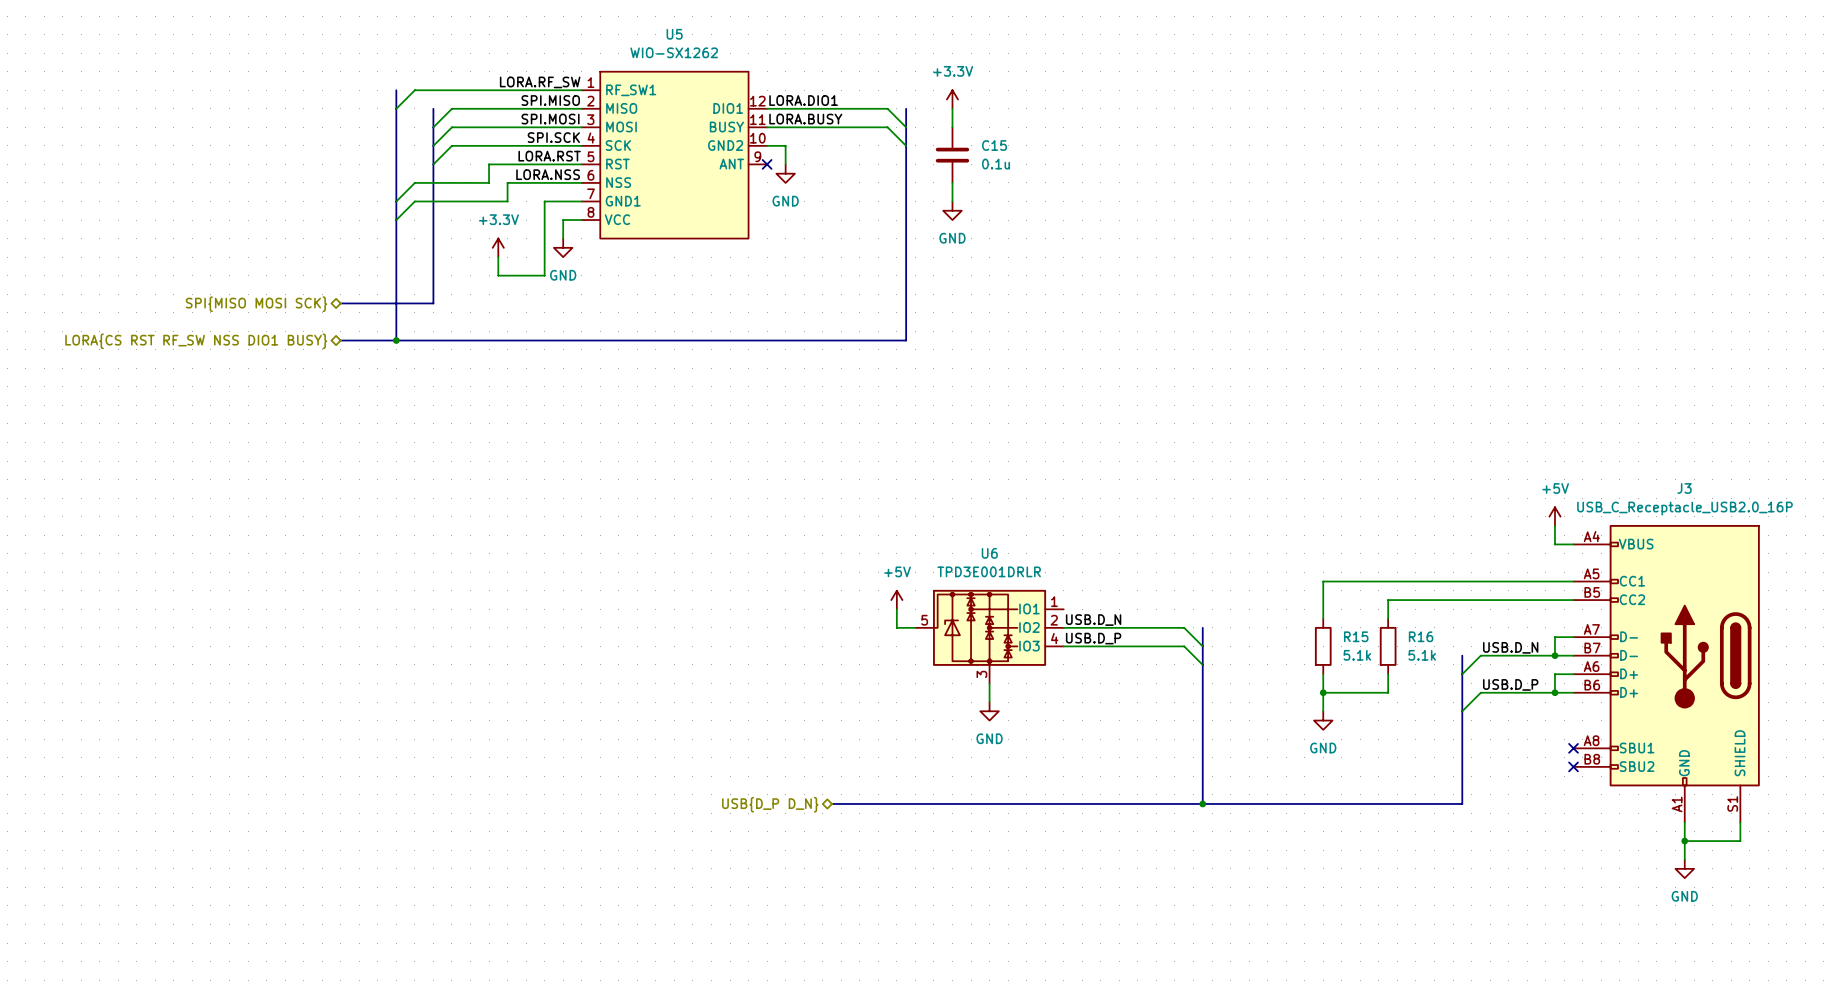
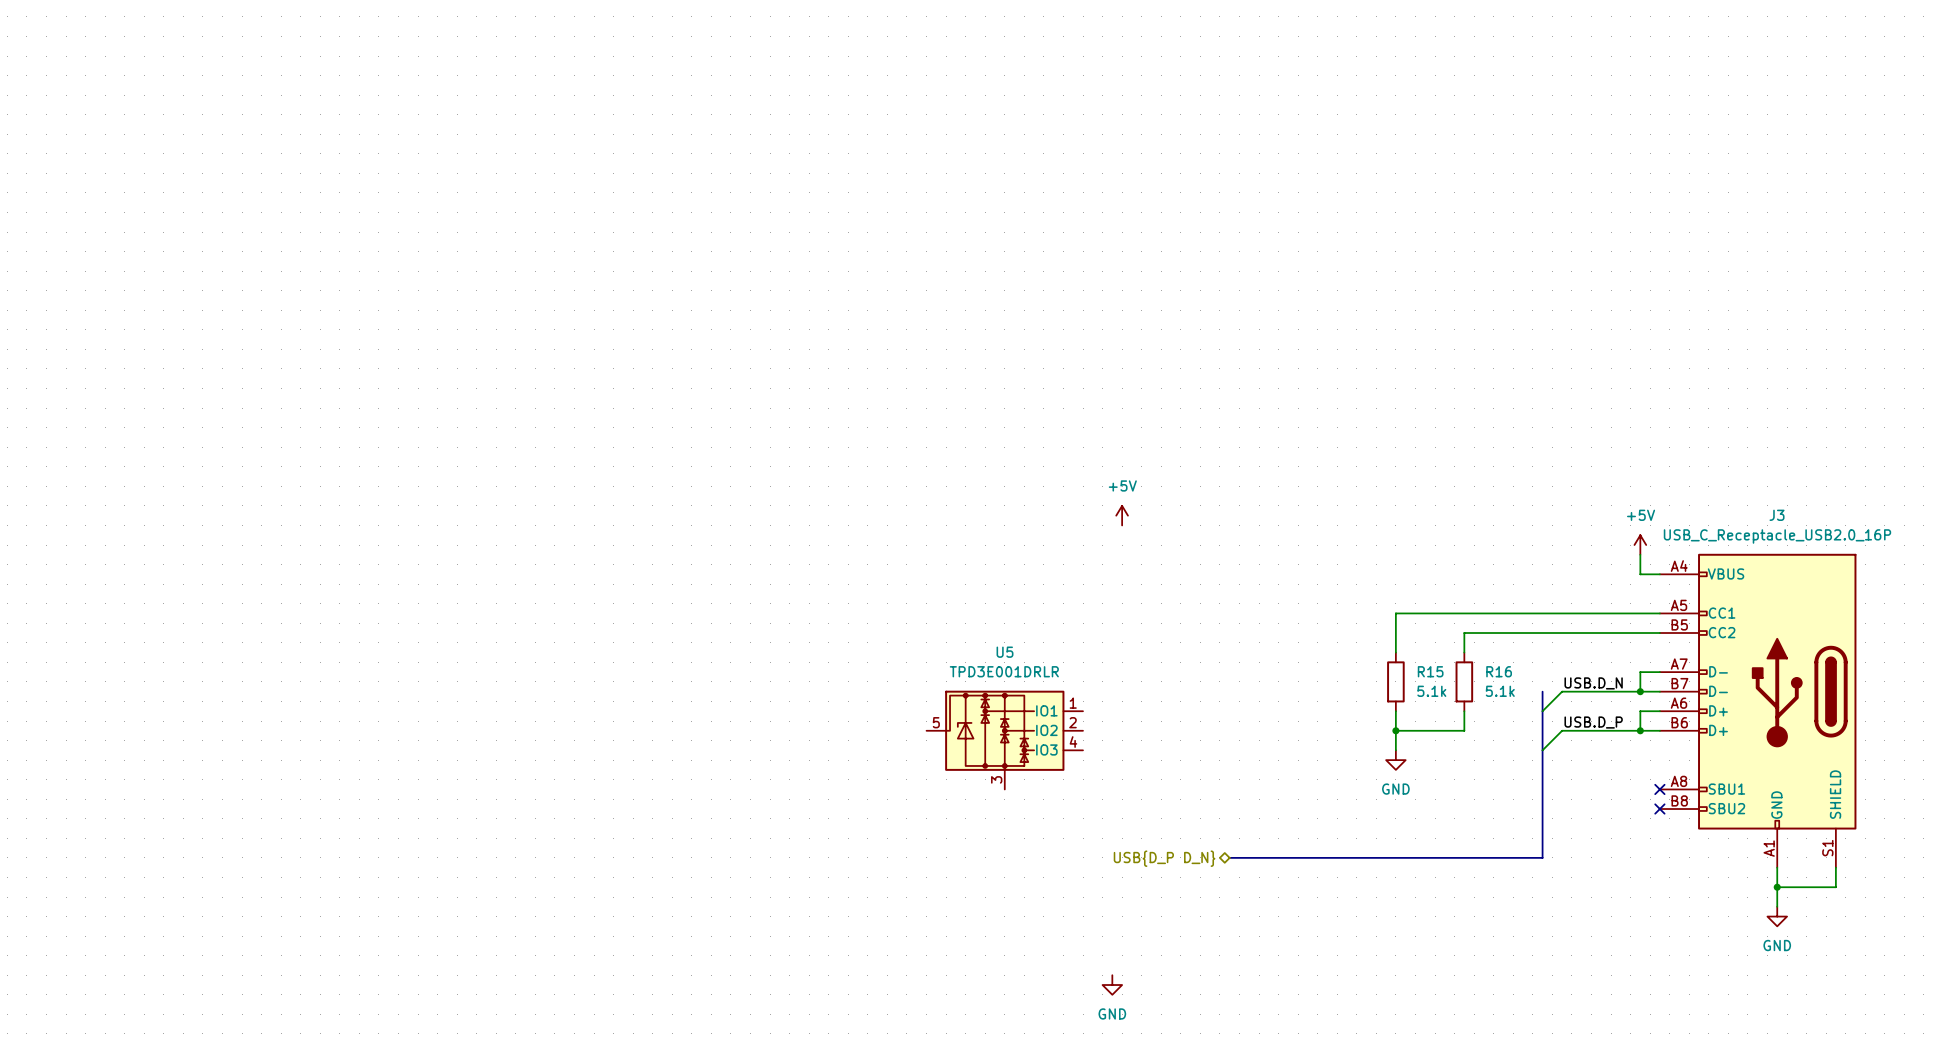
U5 name position: U5 (674, 34) -> U5 (1005, 652)
U5 value: WIO-SX1262 (674, 52) -> TPD3E001DRLR (1004, 671)
U5 symbol: [581, 71, 768, 239] -> [926, 690, 1084, 790]
label: LORA.RF_SW (540, 82) -> none
bus: (396, 90) (396, 340) -> none
wire: (581, 90) (414, 90) (396, 108) -> none
power symbol: +3.3V (952, 99) -> none
label: SPI.MISO (550, 100) -> none
label: LORA.DIO1 (803, 100) -> none
bus: (433, 108) (433, 303) (340, 303) -> none
wire: (581, 108) (451, 108) (433, 127) -> none
wire: (767, 108) (887, 108) (906, 127) -> none
bus: (906, 108) (906, 340) (340, 340) -> none
wire: (952, 108) (952, 127) -> none
label: SPI.MOSI (550, 119) -> none
label: LORA.BUSY (805, 119) -> none
wire: (581, 127) (451, 127) (433, 145) -> none
wire: (767, 127) (887, 127) (906, 145) -> none
label: SPI.SCK (553, 137) -> none
wire: (581, 145) (451, 145) (433, 164) -> none
wire: (767, 145) (785, 145) (785, 164) -> none
C15: 0.1u (952, 155) -> none
label: LORA.RST (549, 156) -> none
wire: (581, 164) (489, 164) (489, 182) (414, 182) (396, 201) -> none
no-connect mark: (767, 164) -> none
power symbol: GND (785, 173) -> none
label: LORA.NSS (548, 174) -> none
wire: (581, 182) (507, 182) (507, 201) (414, 201) (396, 220) -> none
wire: (952, 182) (952, 201) -> none
wire: (581, 201) (544, 201) (544, 275) (498, 275) (498, 257) -> none
power symbol: GND (952, 210) -> none
wire: (581, 220) (563, 220) (563, 238) -> none
power symbol: +3.3V (498, 247) -> none
power symbol: GND (563, 247) -> none
hierarchical label: SPI{MISO MOSI SCK} (256, 304) -> none
junction: (396, 340) -> none
hierarchical label: LORA{CS RST RF_SW NSS DIO1 BUSY} (196, 341) -> none
power symbol: none -> +5V (1122, 515)
power symbol: +5V (896, 600) -> none
wire: (896, 609) (896, 627) (915, 627) -> none
label: USB.D_N (1093, 620) -> none
wire: (1063, 627) (1184, 627) (1202, 646) -> none
bus: (1202, 627) (1202, 803) -> none
U6: TPD3E001DRLR (989, 636) -> none
label: USB.D_P (1093, 638) -> none
wire: (1063, 646) (1184, 646) (1202, 664) -> none
power symbol: GND (989, 711) -> none
bus: (831, 803) (1462, 803) -> (1229, 857) (1542, 857) (1542, 848)
junction: (1202, 803) -> none
hierarchical label: USB{D_P D_N} (770, 804) -> none
hierarchical label: none -> USB{D_P D_N} (1164, 858)
power symbol: none -> GND (1112, 985)

